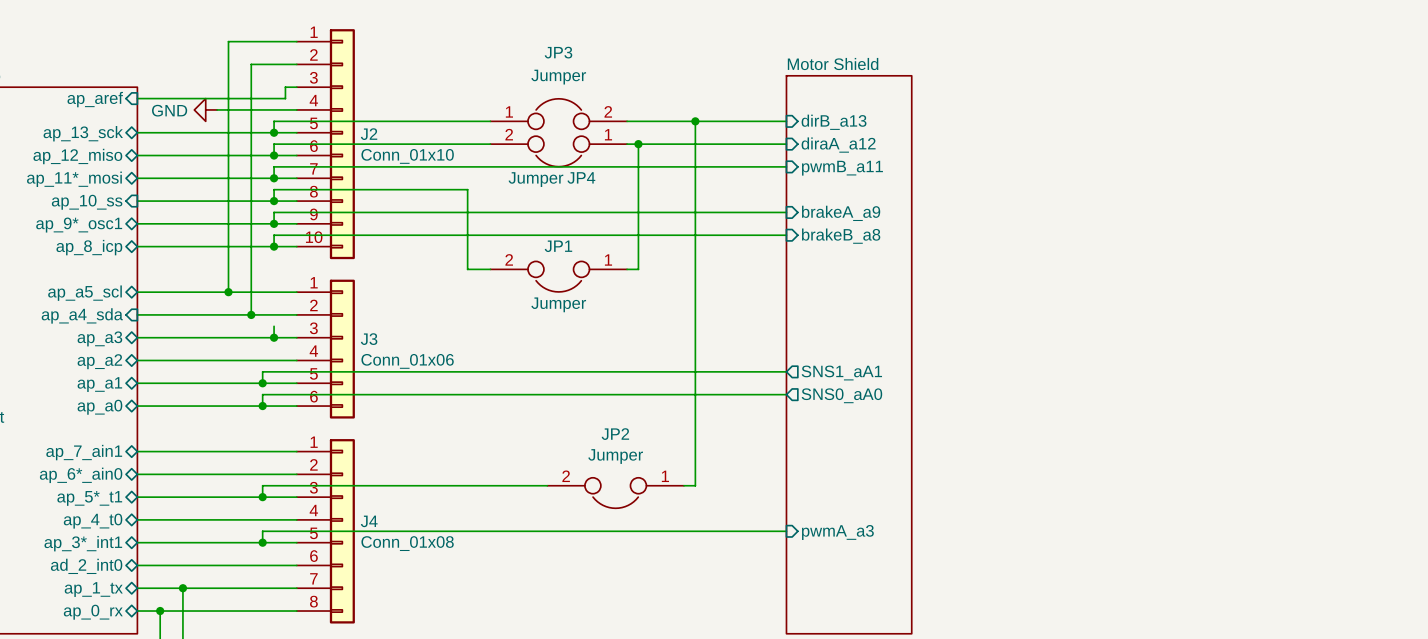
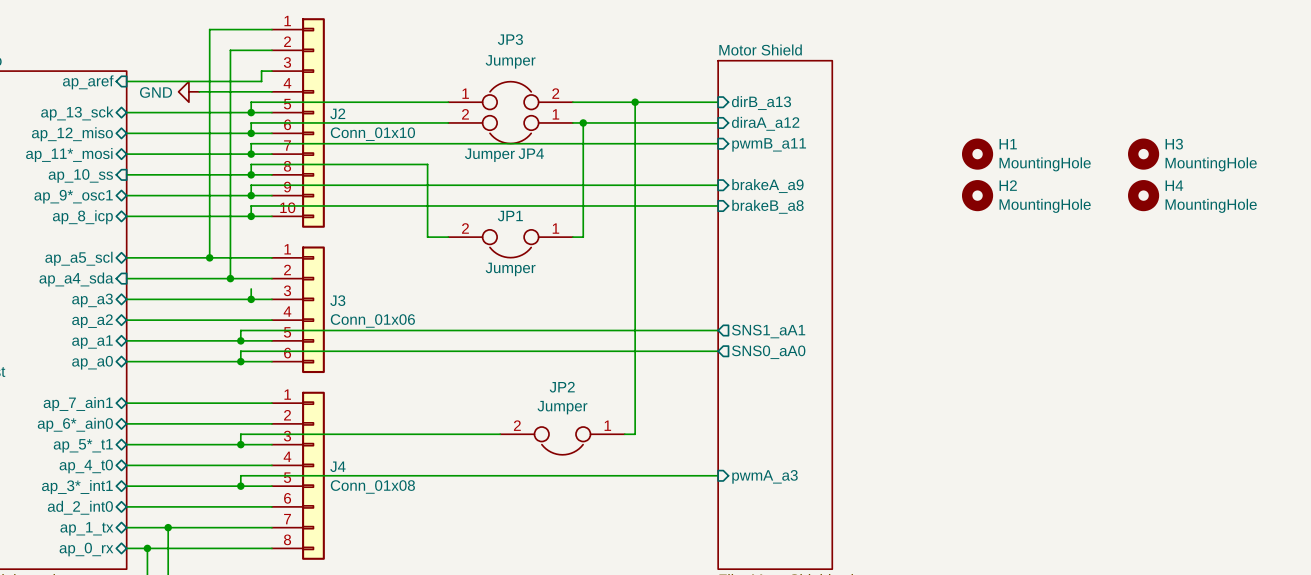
H1: none -> MountingHole (977, 154)
H3: none -> MountingHole (1143, 154)
H2: none -> MountingHole (977, 195)
H4: none -> MountingHole (1143, 195)

